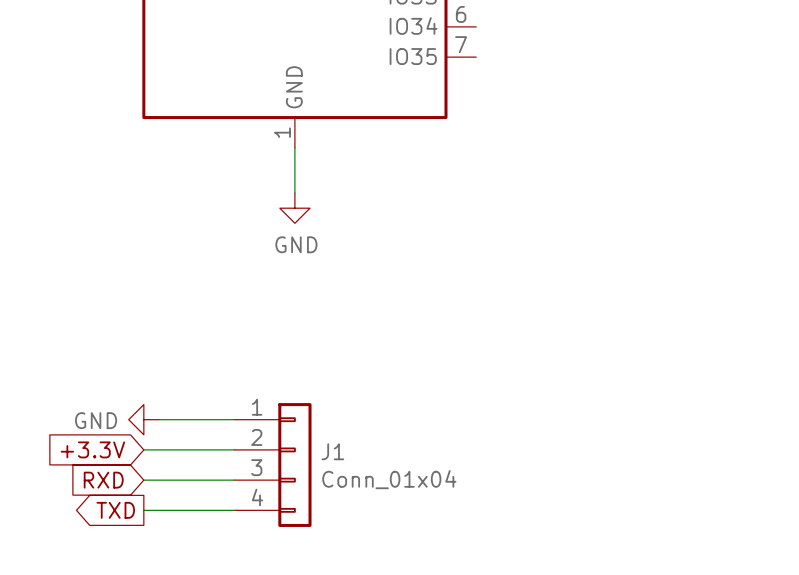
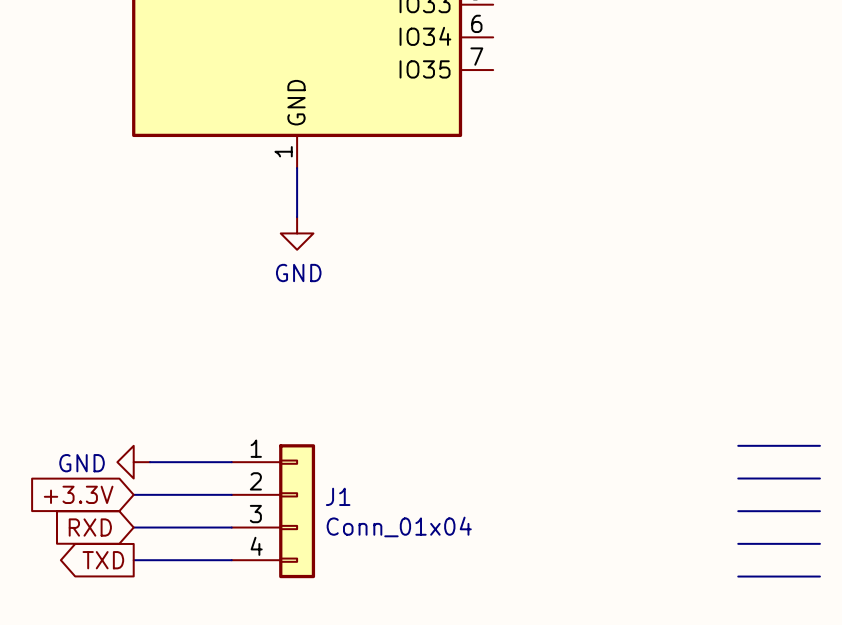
wire: none -> (738, 445) (819, 445)
wire: none -> (738, 478) (819, 478)
wire: none -> (738, 511) (819, 511)
wire: none -> (738, 543) (819, 543)
wire: none -> (738, 576) (819, 576)

